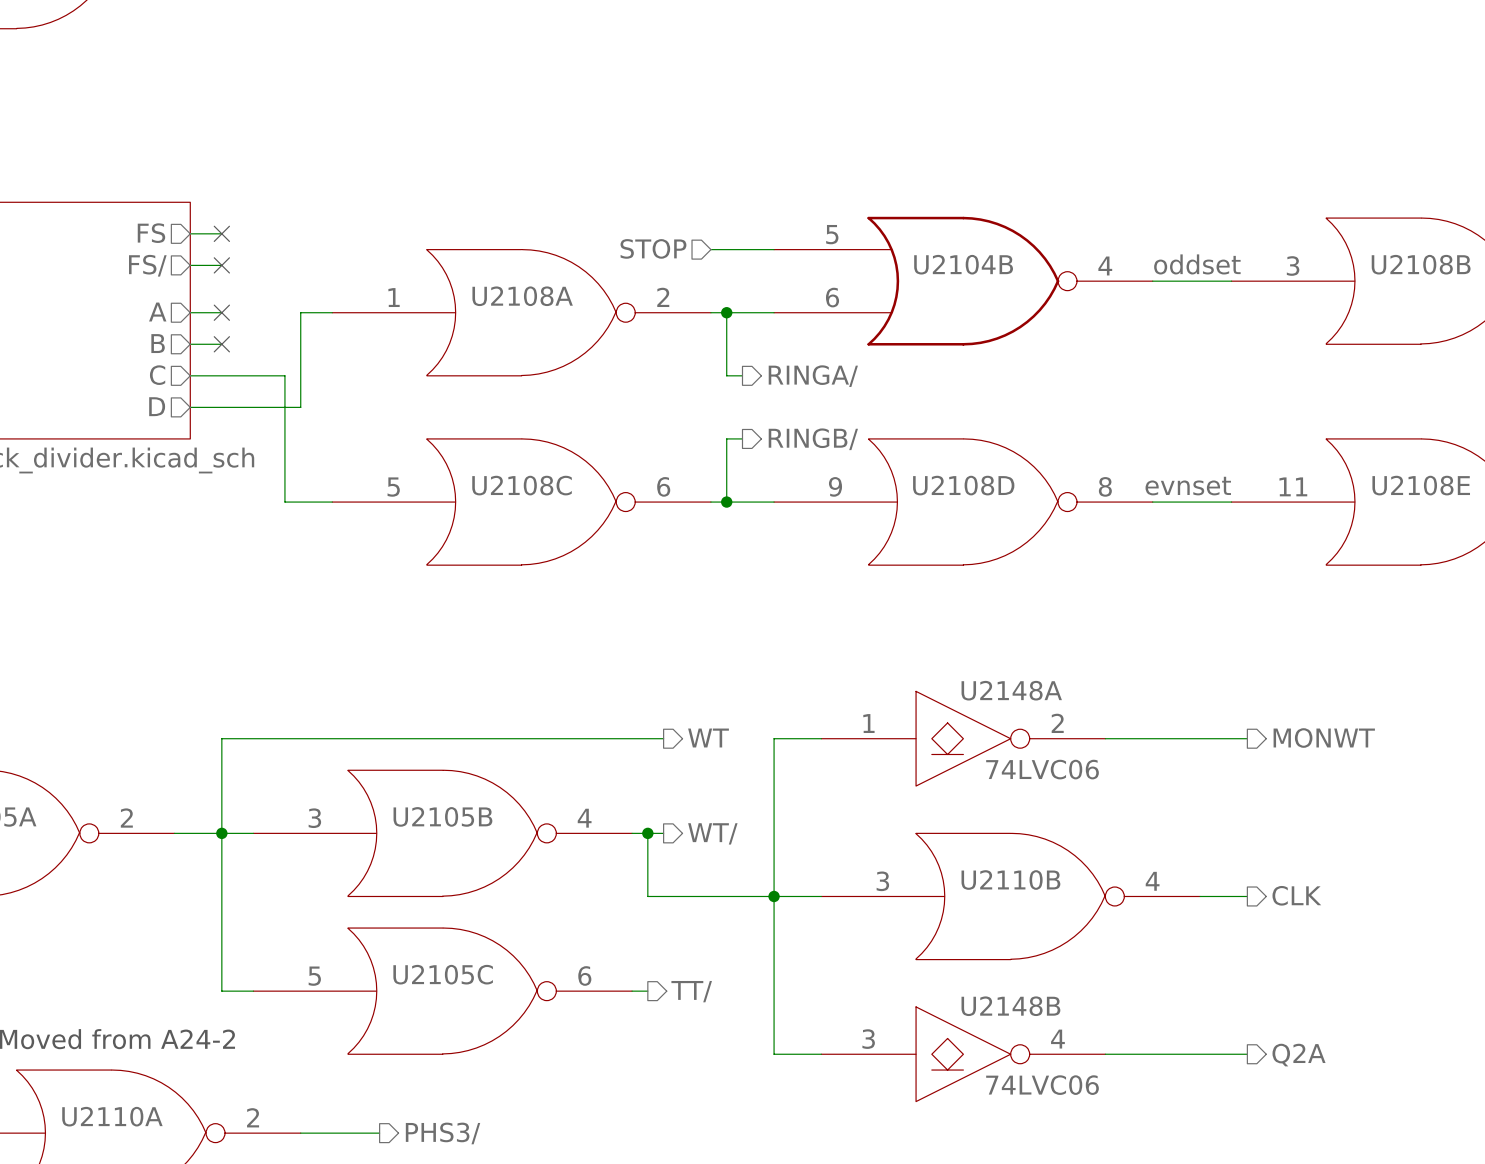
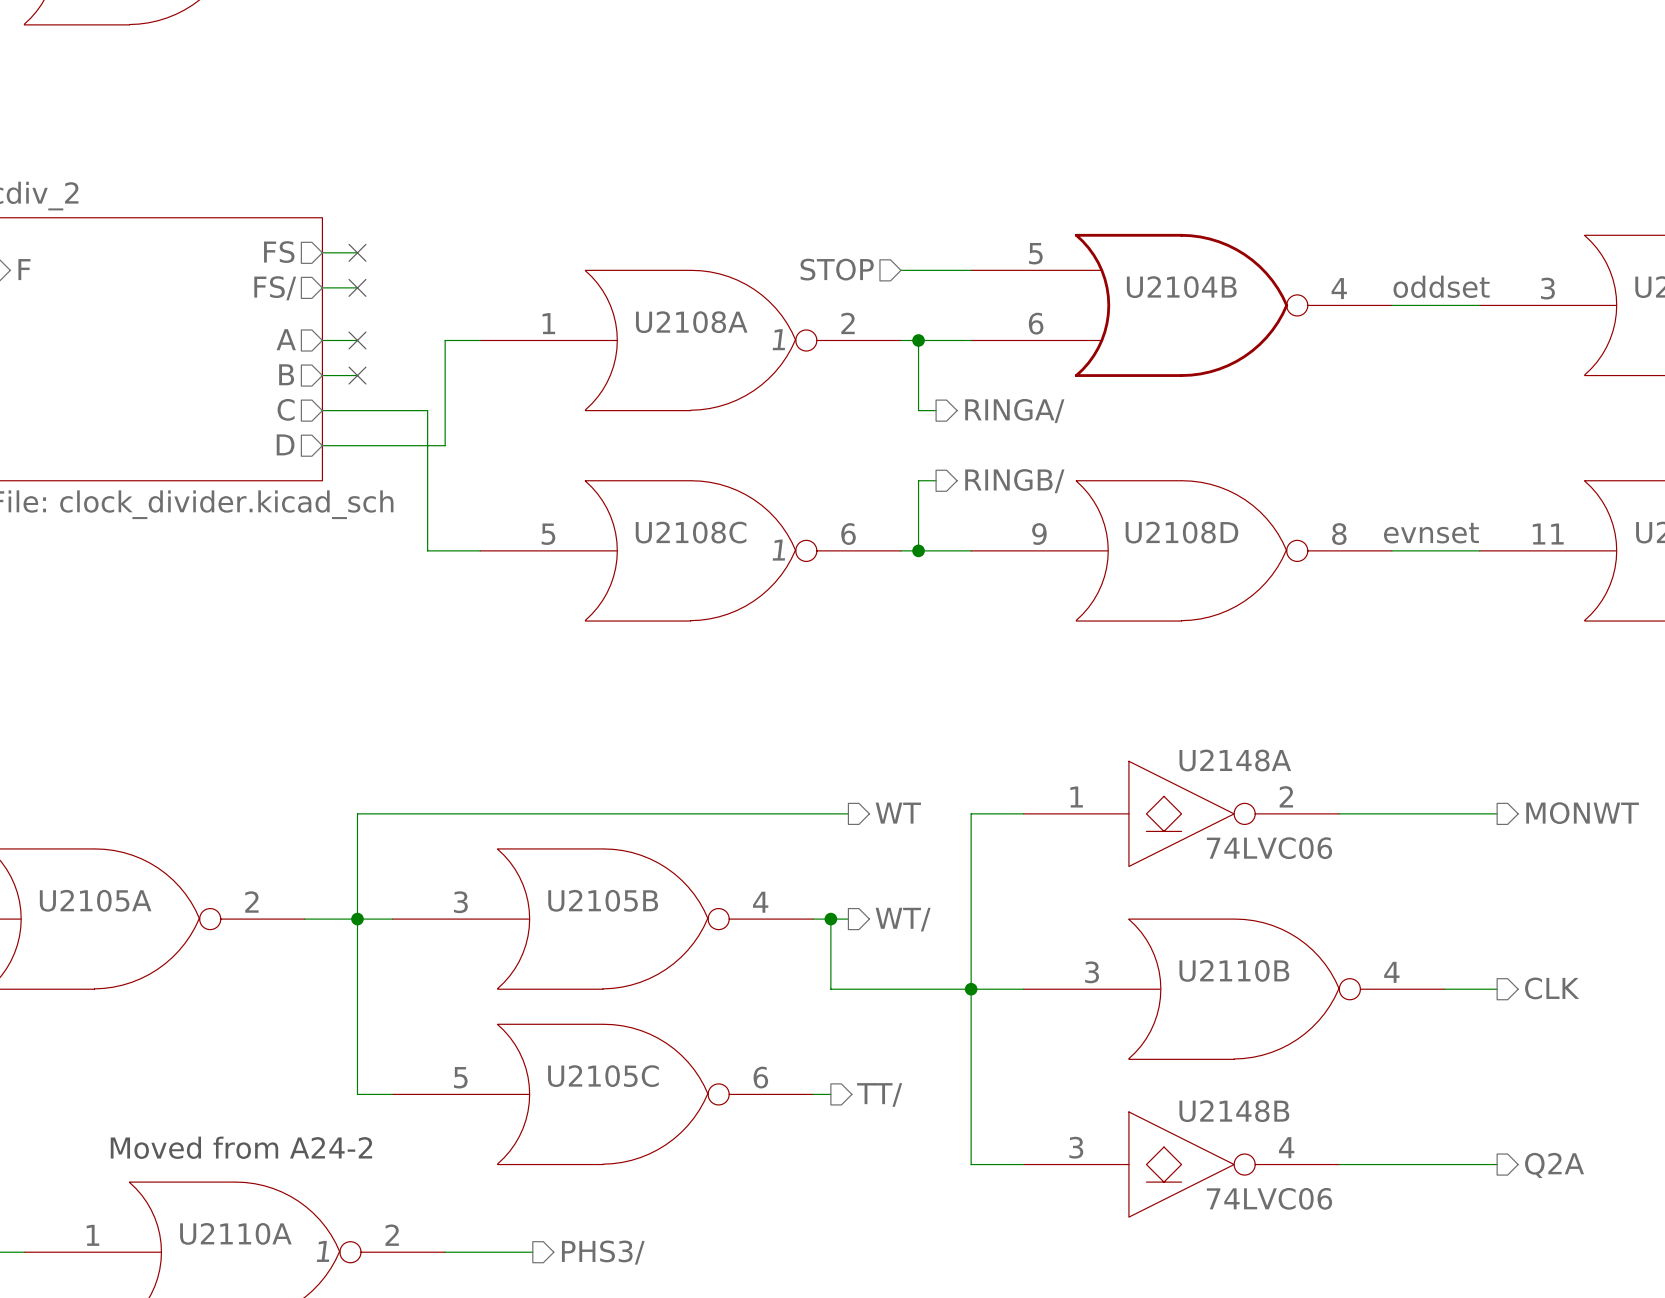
U2108A text: none -> 1 (778, 339)
U2108C text: none -> 1 (778, 550)
U2110A text: none -> 1 (323, 1251)

